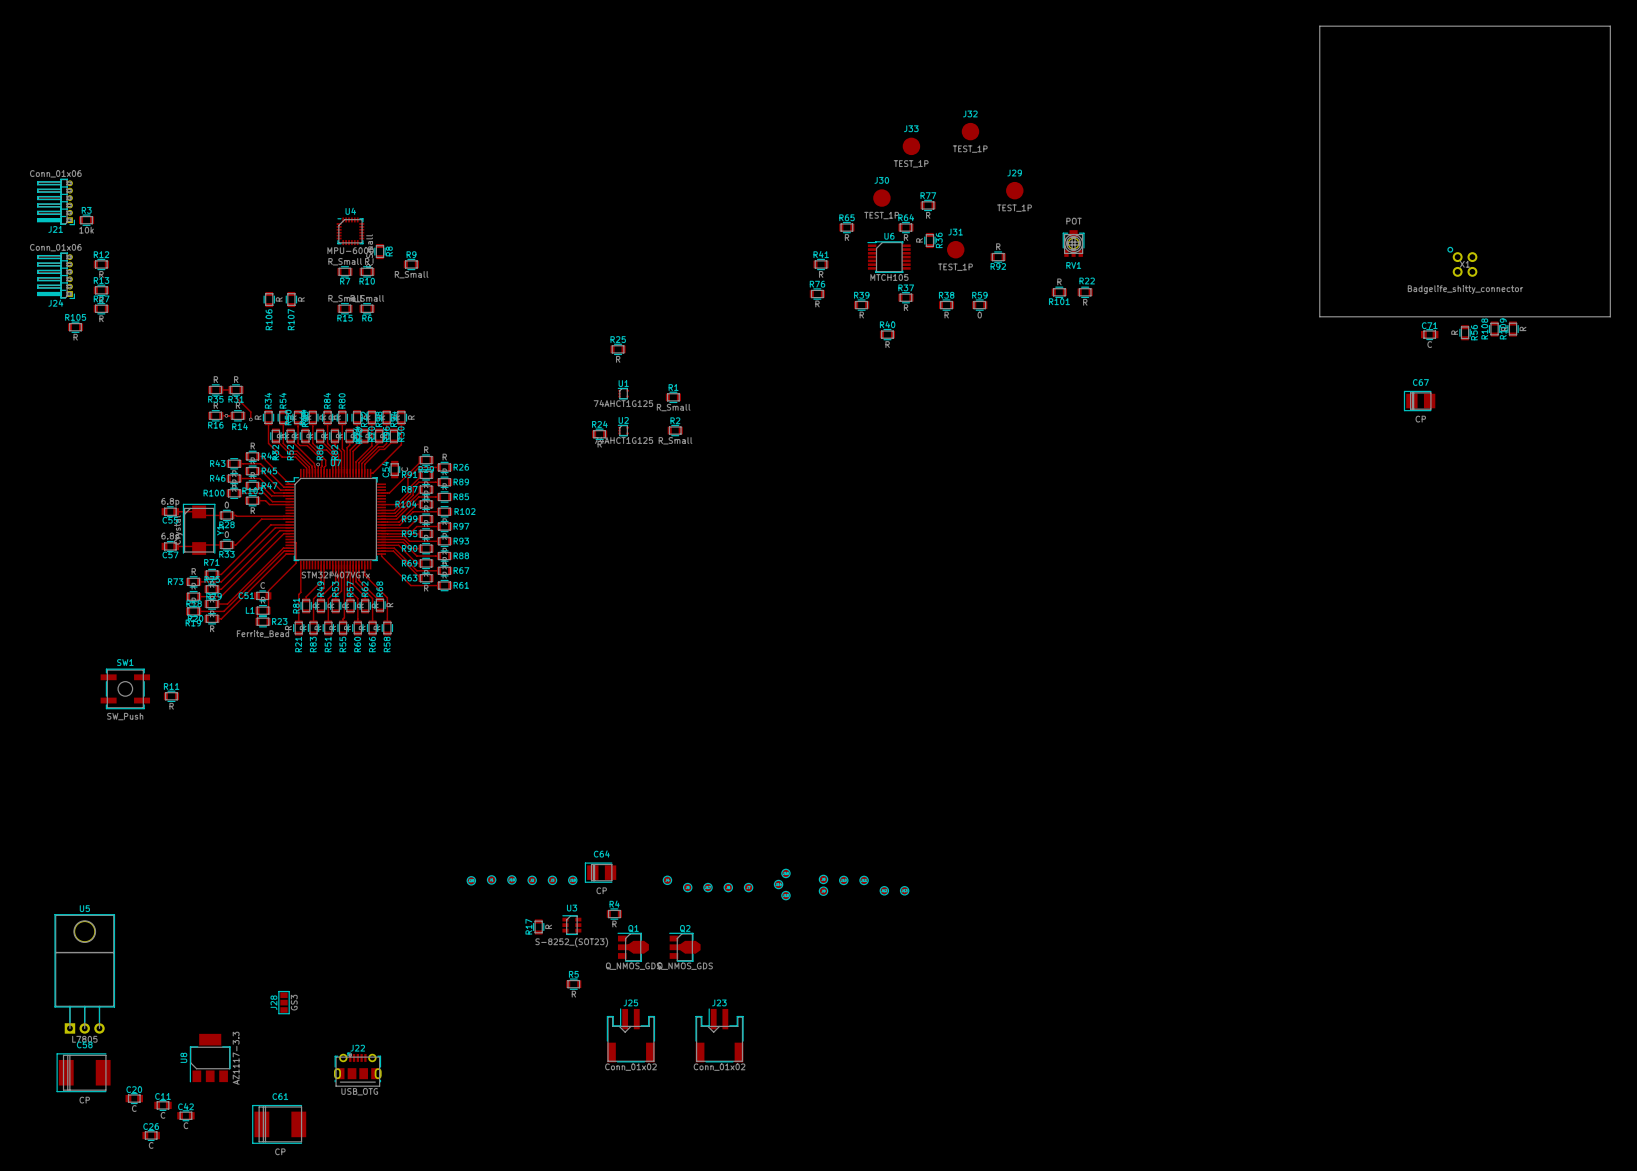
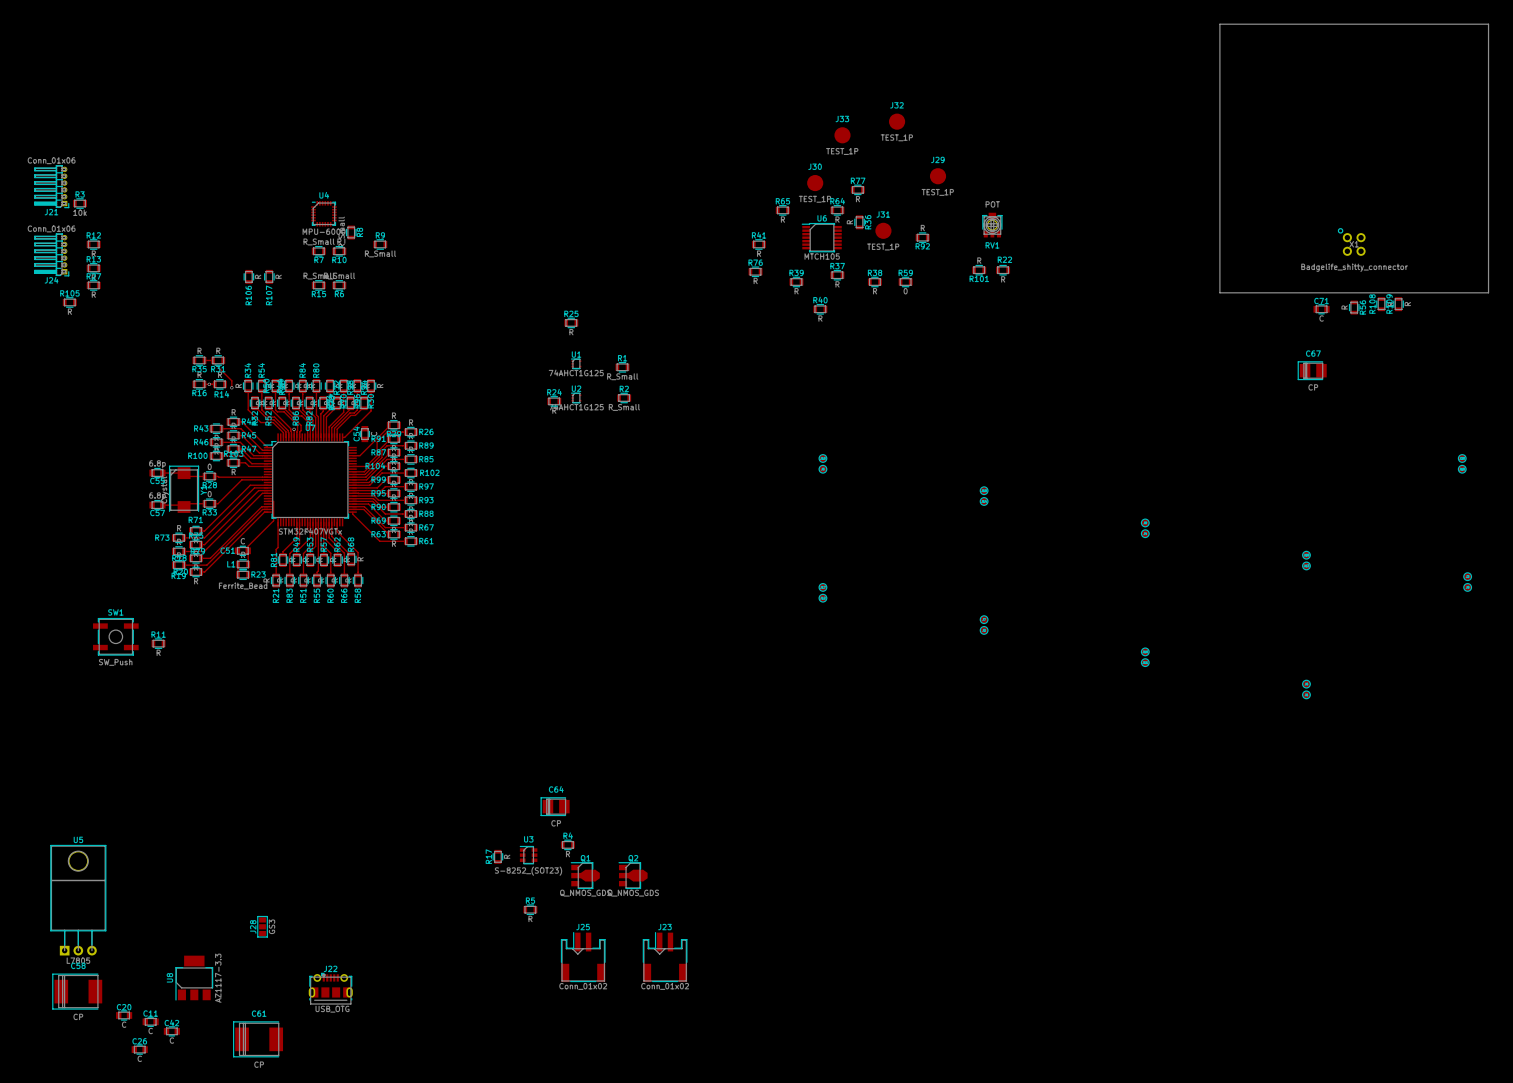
part position: (785, 873) -> (1145, 651)
part position: (491, 879) -> (1306, 694)
part position: (511, 879) -> (984, 490)
part position: (823, 879) -> (1467, 587)
part position: (471, 880) -> (1462, 458)
part position: (532, 880) -> (984, 630)
part position: (552, 880) -> (1467, 576)
part position: (572, 880) -> (1306, 555)
part position: (667, 880) -> (1145, 533)
part position: (843, 880) -> (822, 458)
part position: (864, 880) -> (1145, 662)
part position: (778, 884) -> (984, 501)
part position: (687, 887) -> (822, 469)
part position: (708, 887) -> (822, 587)
part position: (728, 887) -> (1306, 684)
part position: (748, 887) -> (984, 619)
part position: (884, 890) -> (822, 598)
part position: (904, 890) -> (1306, 565)
part position: (823, 891) -> (1145, 522)
part position: (785, 895) -> (1462, 469)

